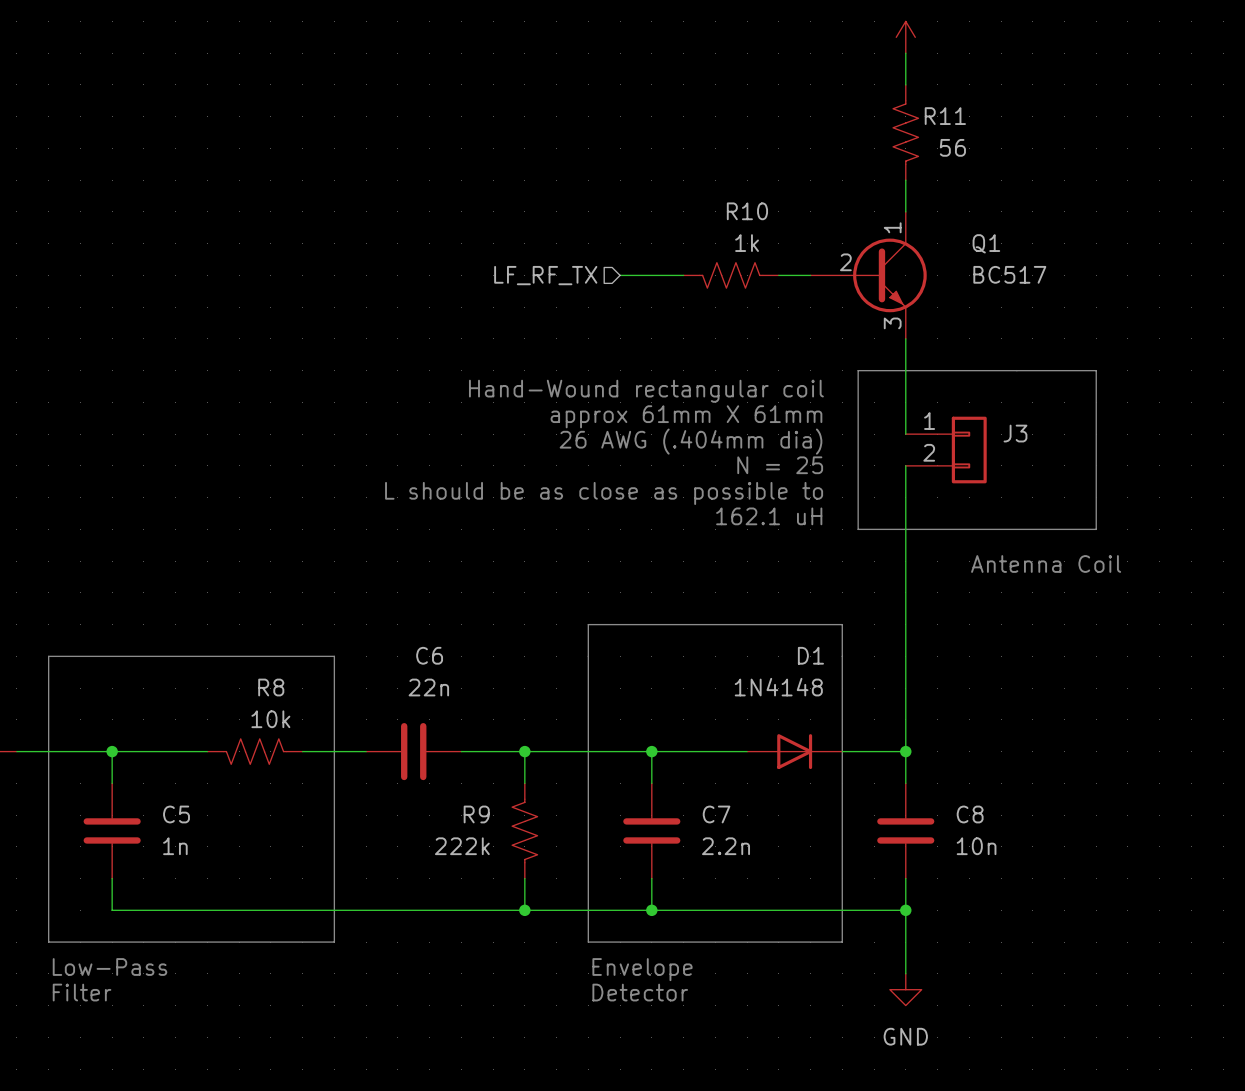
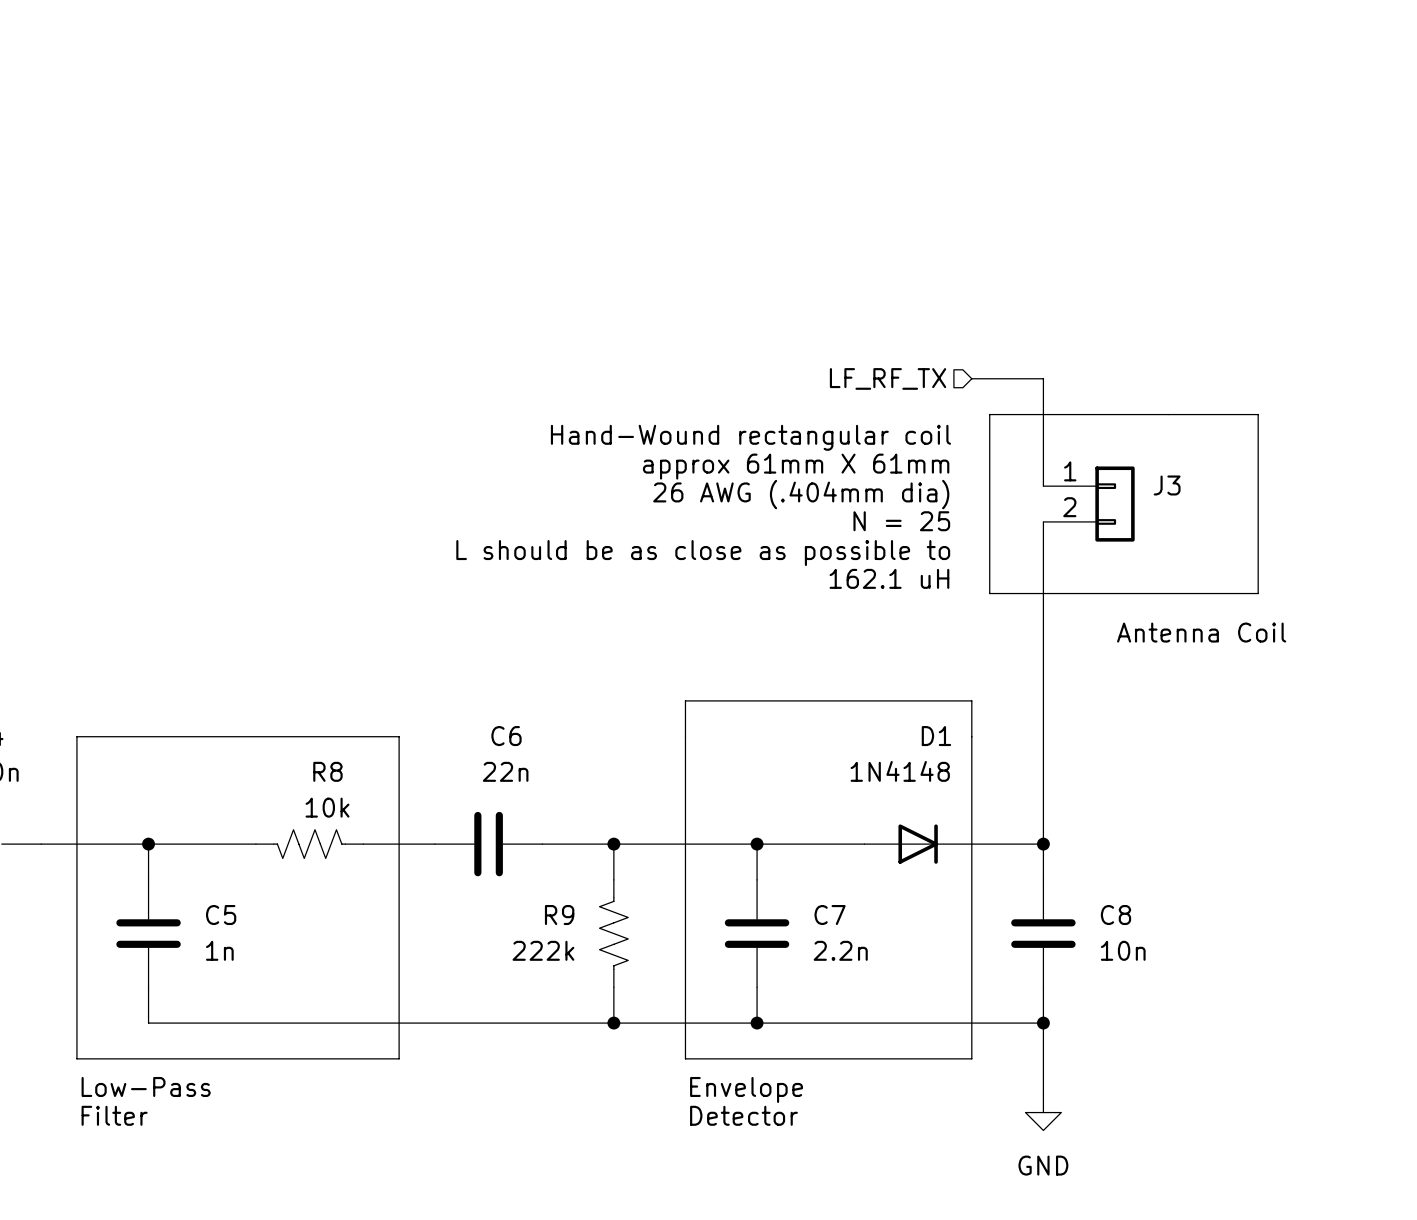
power symbol: (905, 37) -> none
wire: (905, 53) (905, 84) -> none
R11: 56 (905, 132) -> none
wire: (905, 180) (905, 211) -> none
hierarchical label position: LF_RF_TX (545, 275) -> LF_RF_TX (888, 378)
wire: (620, 275) (683, 275) -> (971, 378) (1043, 378)
R10: 1k (731, 275) -> none
wire: (778, 275) (810, 275) -> none
Q1: BC517 (868, 275) -> none

